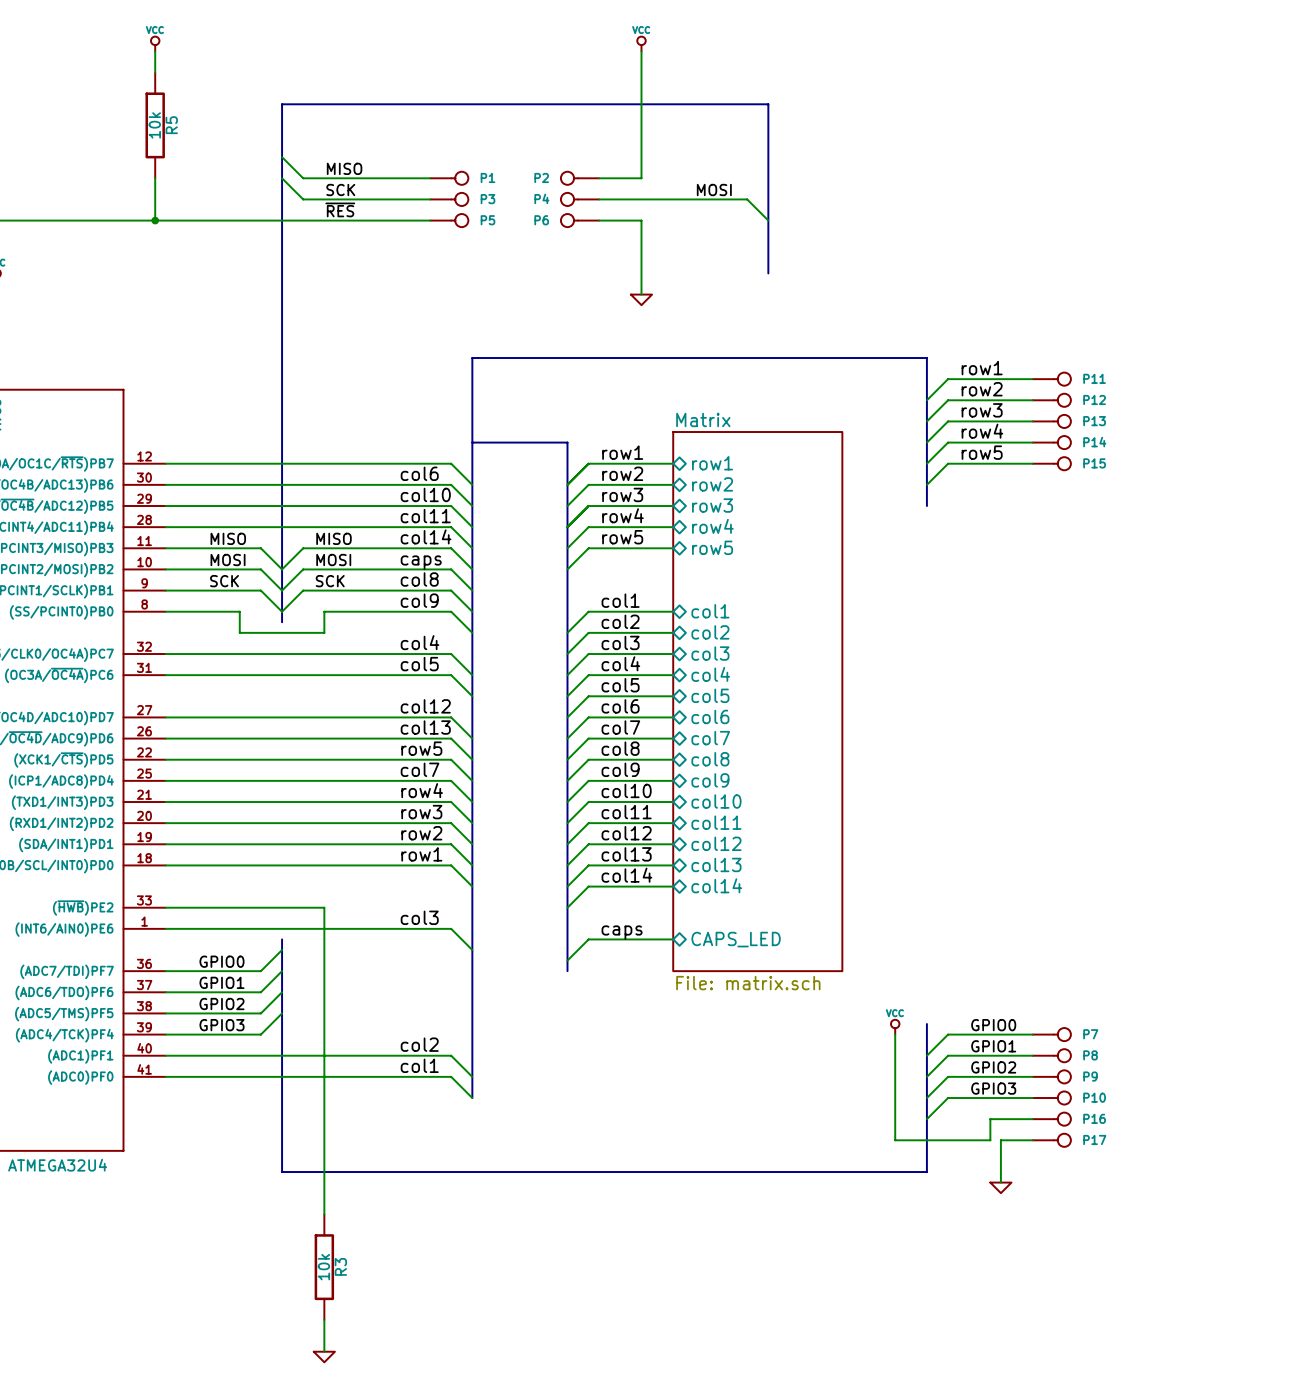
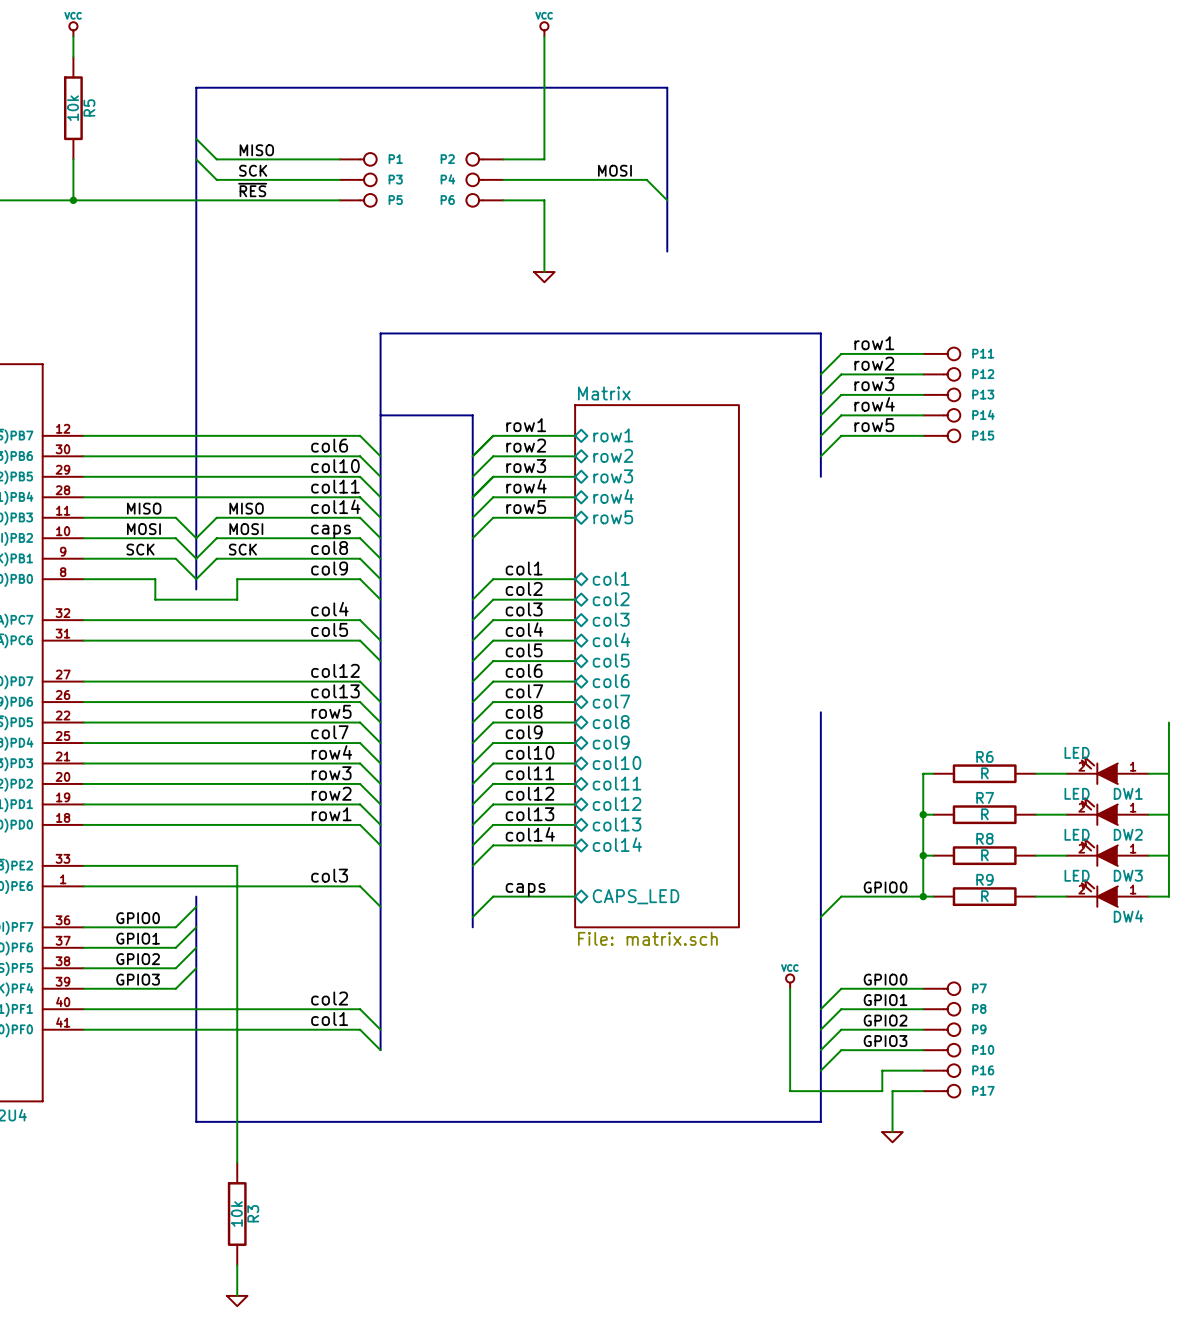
bus: none -> (820, 712) (820, 978)
wire: none -> (1168, 722) (1168, 896) (1148, 896)
DW1: none -> LED (1107, 770)
wire: none -> (933, 773) (923, 773) (923, 896)
R6: none -> R (984, 773)
wire: none -> (1035, 773) (1066, 773)
wire: none -> (1148, 773) (1168, 773)
DW2: none -> LED (1107, 811)
wire: none -> (923, 814) (933, 814)
junction: none -> (923, 814)
R7: none -> R (984, 814)
wire: none -> (1035, 814) (1066, 814)
wire: none -> (1148, 814) (1168, 814)
DW3: none -> LED (1107, 852)
wire: none -> (923, 855) (933, 855)
junction: none -> (923, 855)
R8: none -> R (984, 855)
wire: none -> (1035, 855) (1066, 855)
wire: none -> (1148, 855) (1168, 855)
label: none -> GPIO0 (885, 887)
DW4: none -> LED (1107, 893)
junction: none -> (923, 896)
wire: none -> (933, 896) (841, 896) (820, 917)
R9: none -> R (984, 896)
wire: none -> (1035, 896) (1066, 896)

